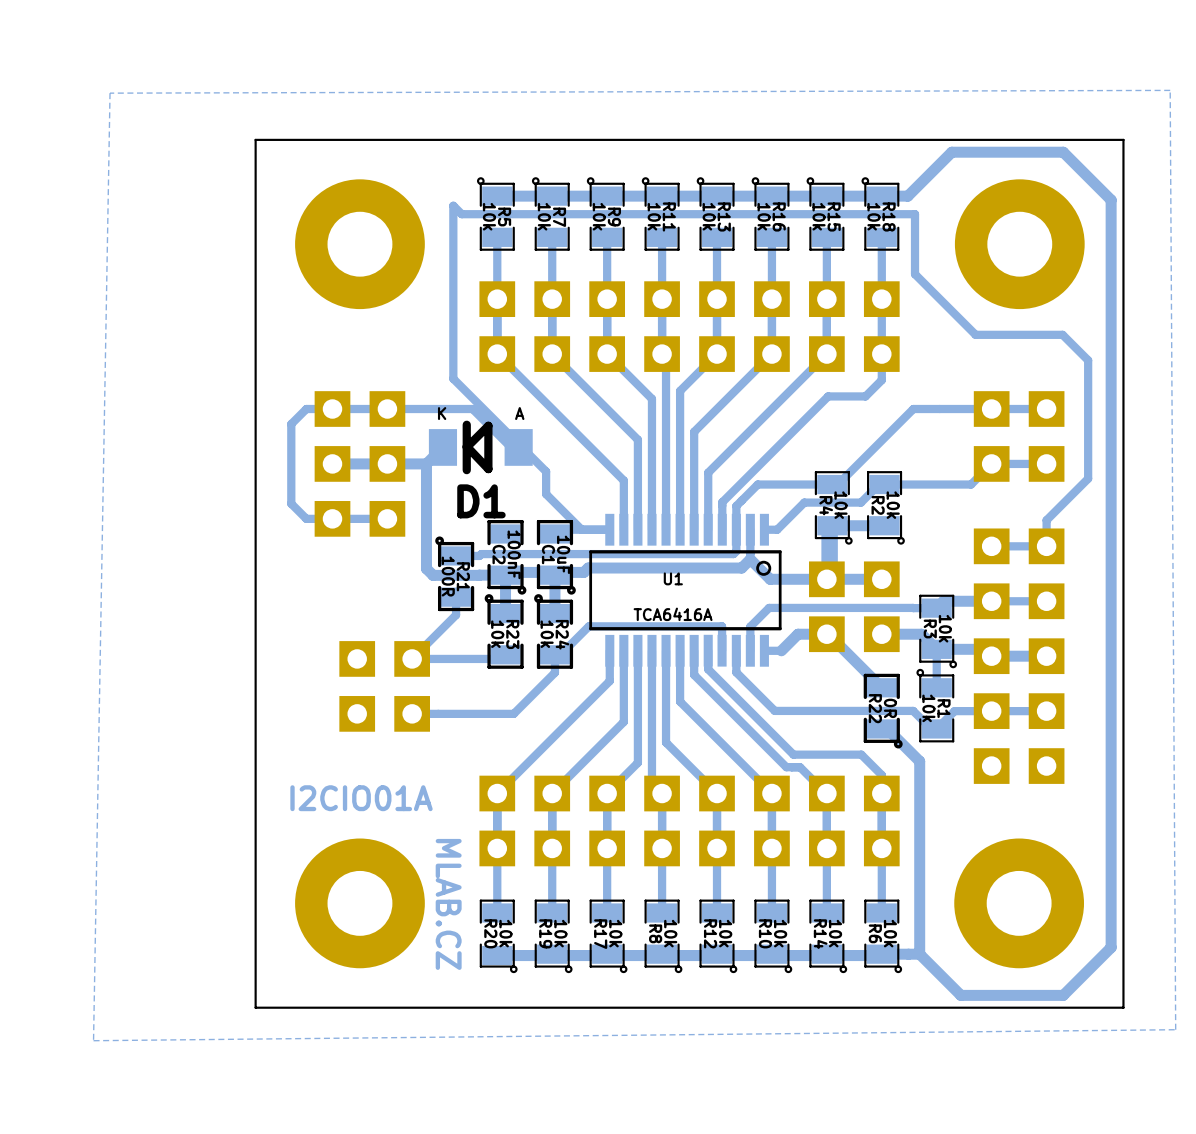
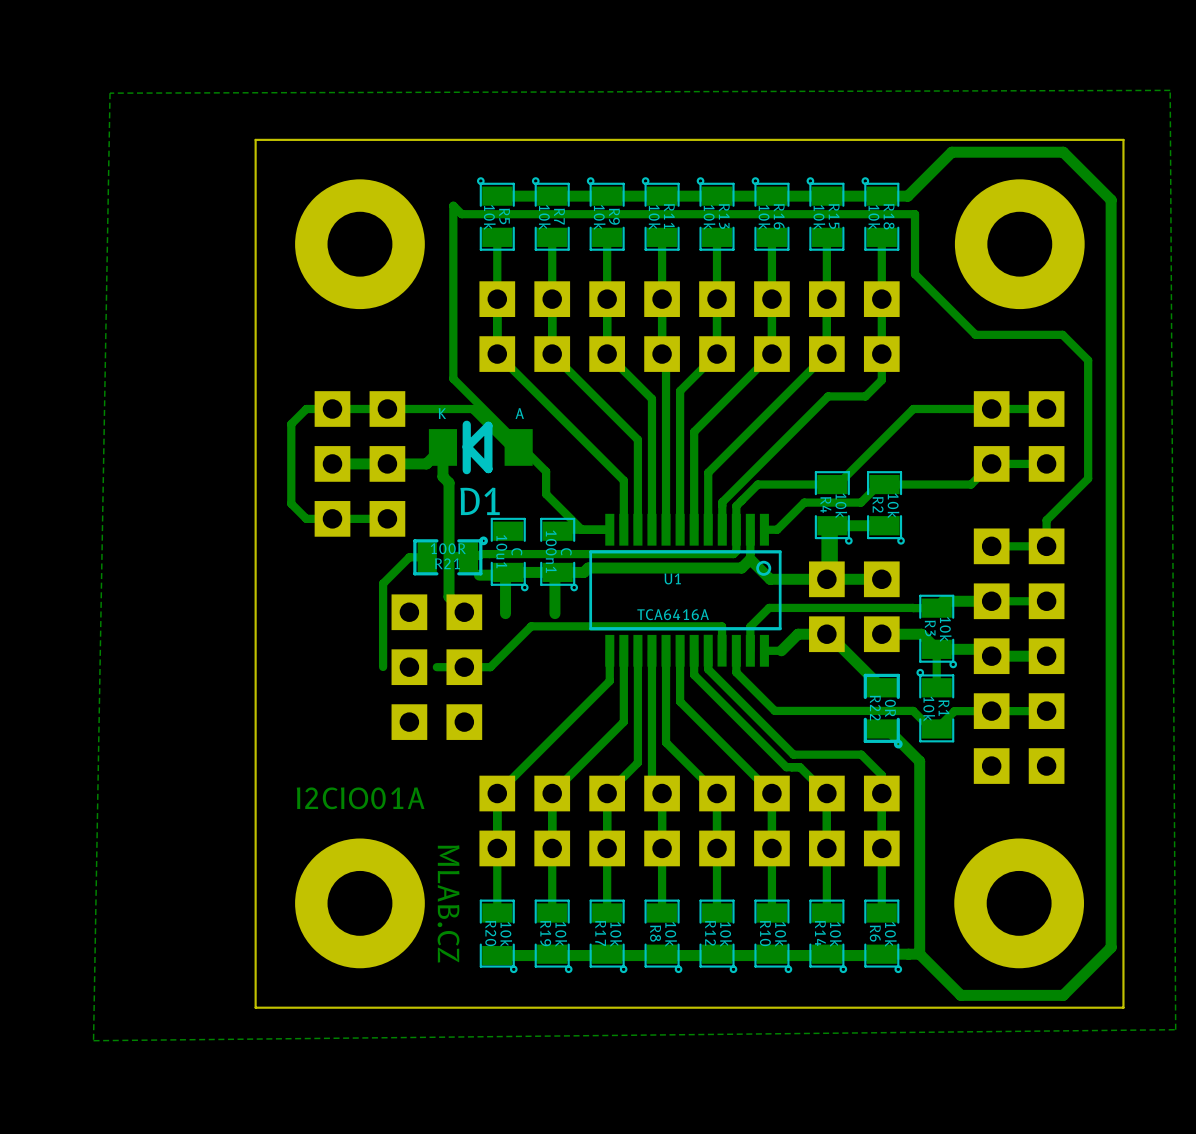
track: none -> (442, 447) (442, 476) (449, 482) (449, 596) (464, 612)
track: (426, 463) (426, 568) (433, 575) (479, 575) -> none
10u1: none -> C (509, 554)
100n1: none -> C (559, 554)
track: none -> (427, 557) (409, 557) (383, 583) (383, 666)
C2: 100nF (506, 557) -> none
C1: 10uF (556, 557) -> none
R21 rotation: 0° (454, 573) -> 90° clockwise (450, 555)
track: (456, 597) (456, 614) (412, 658) (501, 658) (505, 654) (495, 654) -> none
track: (588, 626) (560, 654) (554, 654) (554, 672) (513, 713) (412, 713) -> (588, 626) (531, 626) (490, 667) (464, 667)
R23: 10k (504, 631) -> none
R24: 10k (553, 631) -> none
part: (384, 658) -> none
part: none -> (409, 667)
track: none -> (462, 667) (436, 667)
part: none -> (464, 667)
part: (384, 713) -> none

